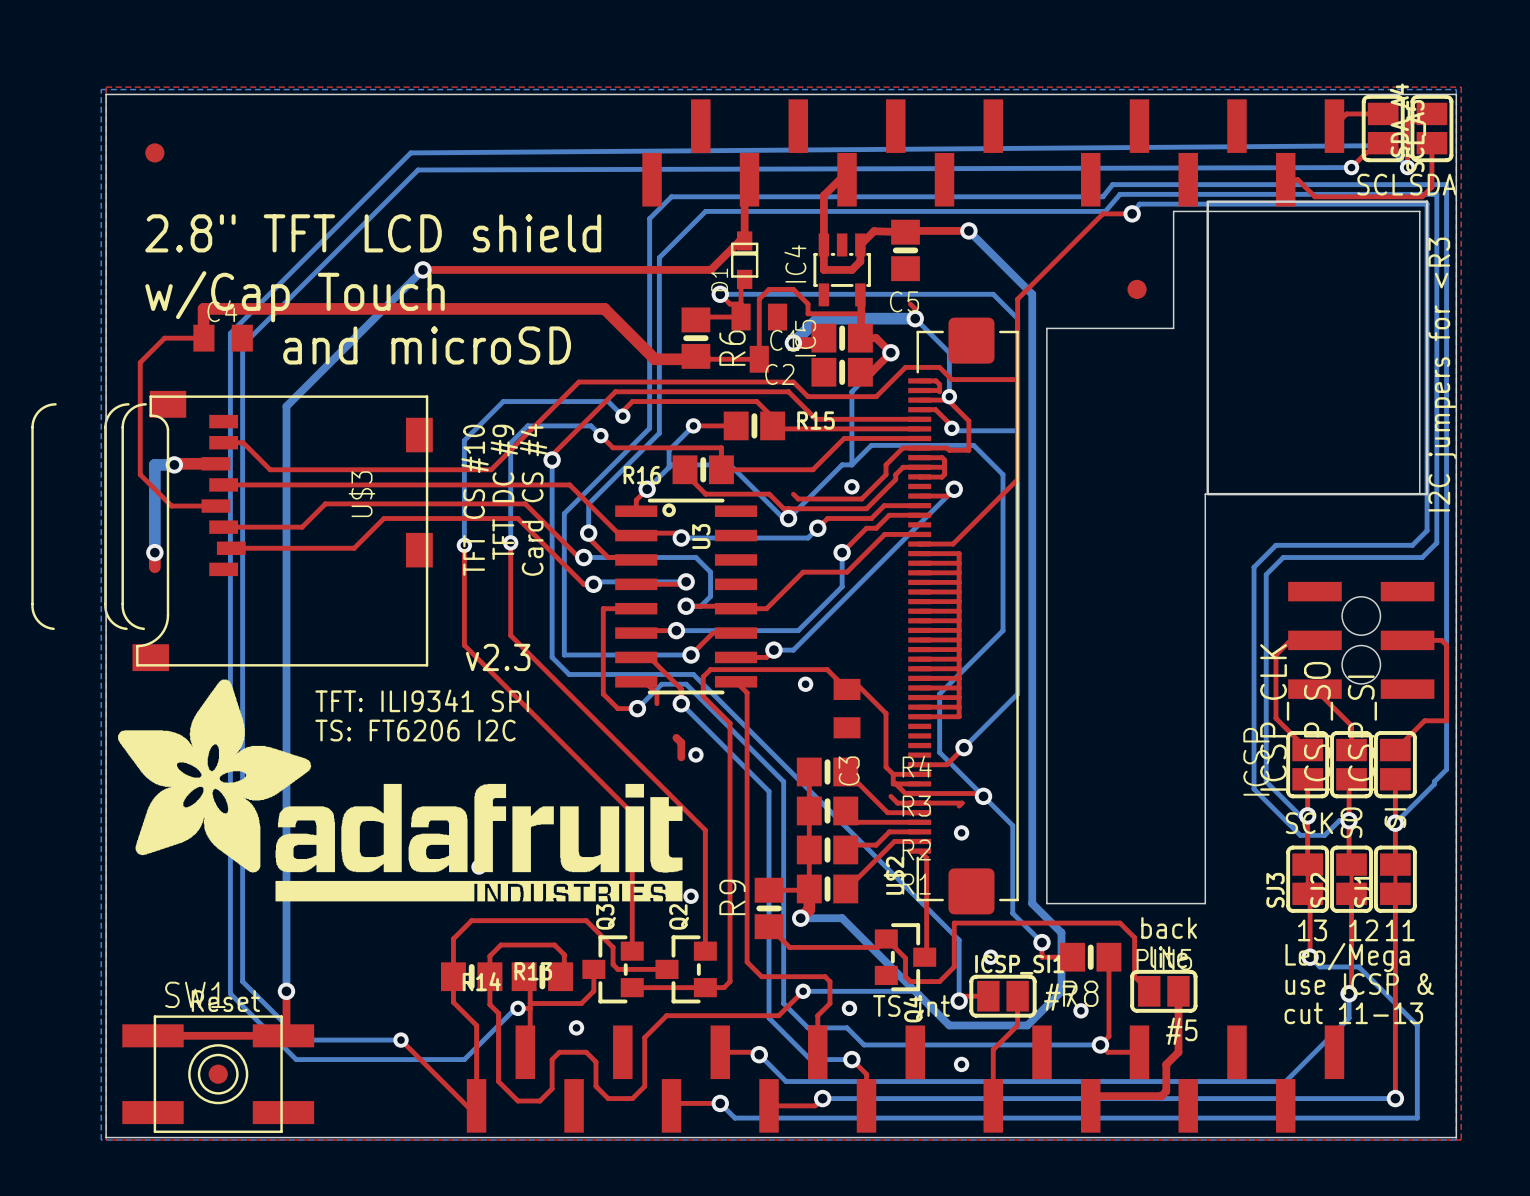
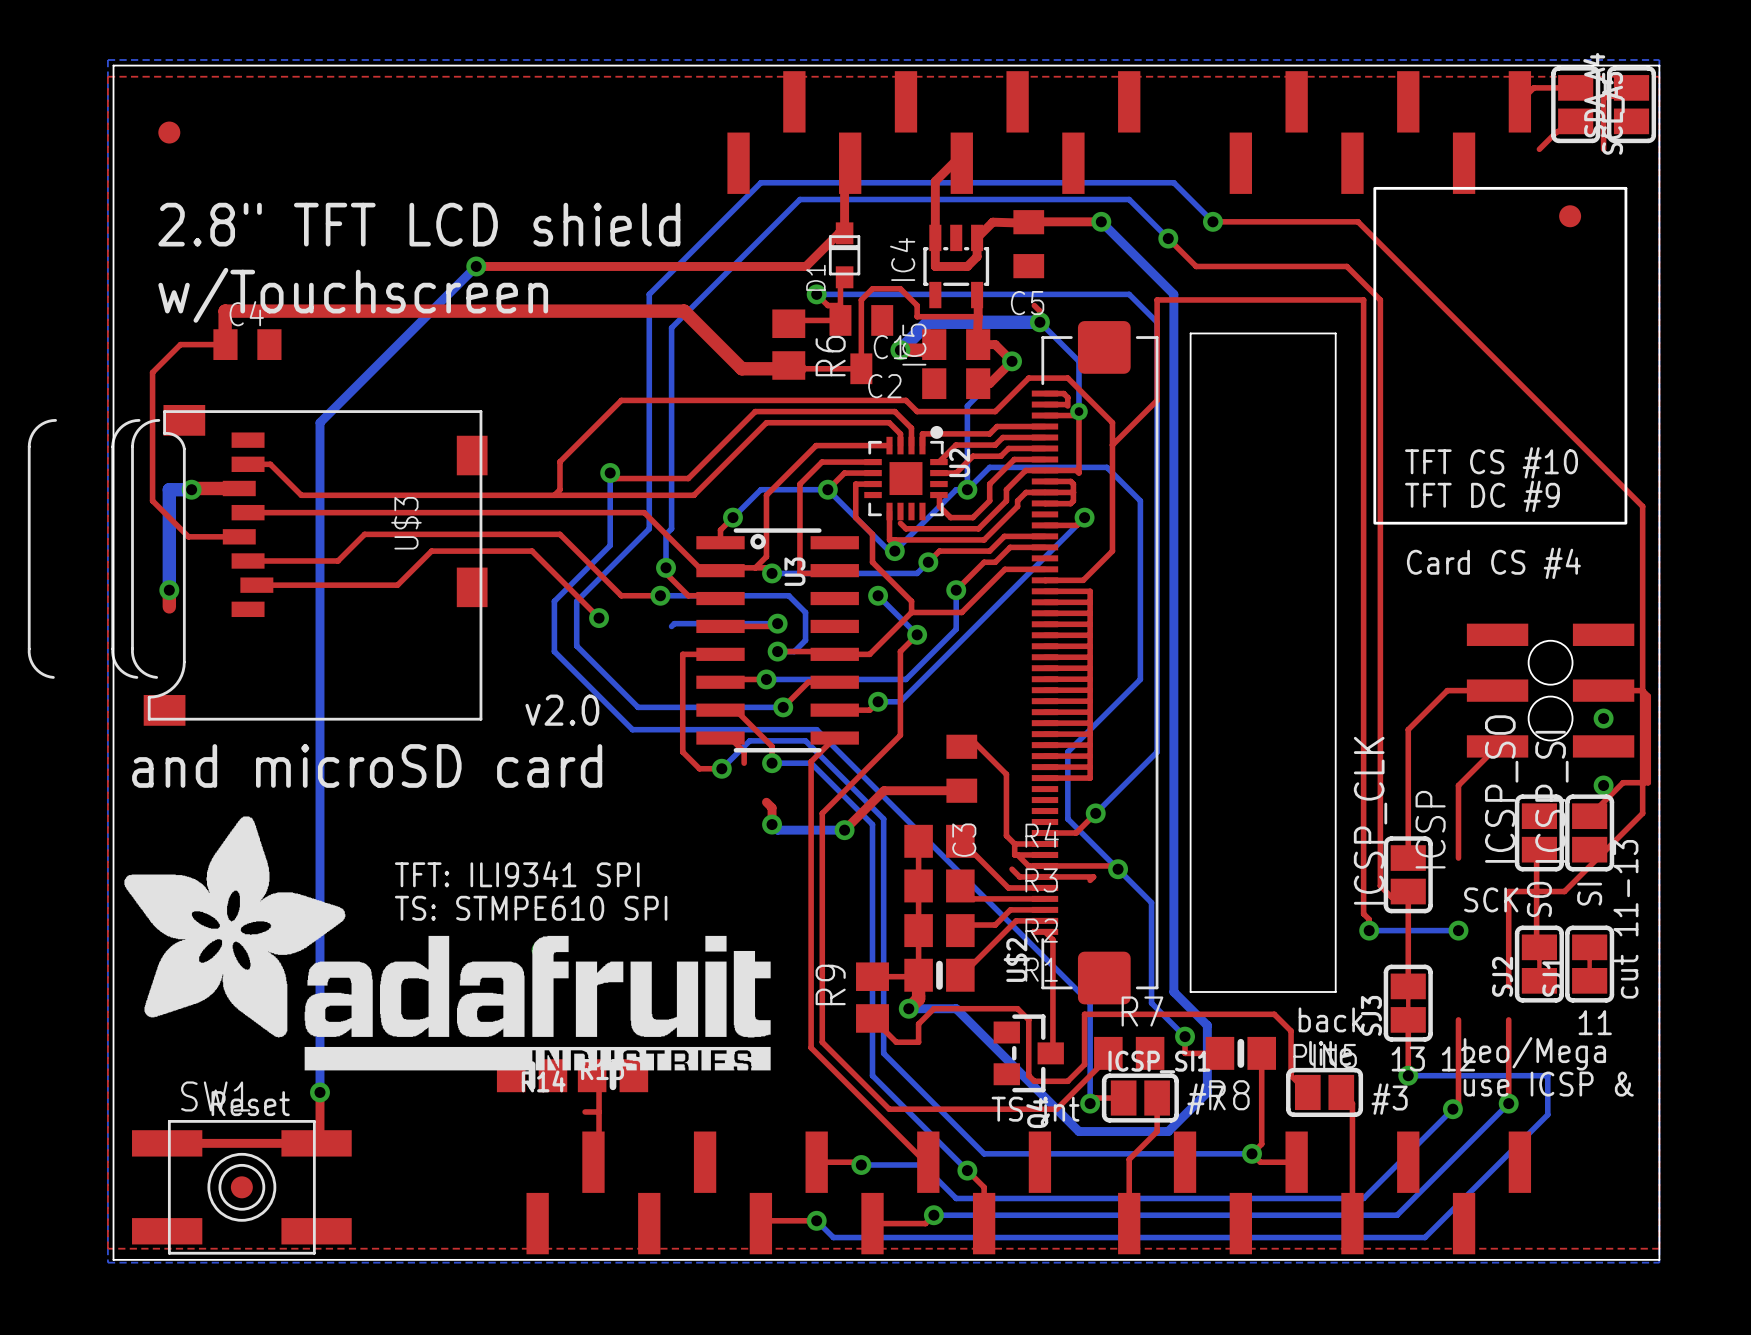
top zone outline: (106, 87) (106, 1140) (1461, 1140) (1461, 87) (106, 87) -> (107, 76) (107, 1248) (1659, 1248) (1659, 76) (107, 76)
top track: (1431, 143) (1431, 187) (1422, 196) (1314, 196) (1297, 179) (1285, 179) -> none
bottom track: (1351, 167) (418, 169) (242, 345) (242, 981) (301, 1040) (401, 1040) -> none
via: (1351, 167) -> none
bottom track: (1407, 167) (1388, 145) (410, 152) (230, 333) (230, 993) (296, 1059) (464, 1059) (518, 1005) (518, 1008) -> none
via: (1407, 167) -> none
text: SCL (1380, 184) -> none
text: SDA (1433, 184) -> none
bottom track: (1032, 196) (1102, 196) (1112, 184) (1446, 184) (1446, 769) (1395, 823) -> (1173, 182) (1212, 221)
bottom track: (993, 211) (1105, 211) (1119, 194) (1436, 194) (1436, 542) (1422, 557) (1283, 557) (1266, 574) (1266, 781) (1300, 815) (1307, 815) -> (1129, 199) (1168, 238)
top track: (1132, 213) (1102, 213) (1017, 299) -> (1369, 930) (1369, 919) (1363, 913) (1363, 299) (1157, 299)
bottom track: (1132, 213) (1139, 204) (1427, 204) (1427, 530) (1412, 545) (1275, 545) (1254, 567) (1254, 789) (1300, 835) (1324, 835) (1339, 820) (1349, 820) (1346, 818) -> none
via: (1132, 213) -> none
bottom track: (649, 218) (649, 428) (564, 513) (564, 654) -> (735, 207) (649, 294) (649, 528) (576, 601) (576, 645) (638, 707)
C5 footprint: [891, 219, 920, 282] -> [1013, 210, 1045, 279]
top track: none -> (1212, 221) (1358, 221) (1642, 506) (1642, 813) (1564, 891) (1508, 891) (1508, 986)
via: none -> (1212, 221)
top track: none -> (1168, 238) (1196, 266) (1346, 266) (1380, 299) (1380, 885) (1391, 897) (1408, 897)
via: none -> (1168, 238)
bottom track: (659, 257) (659, 433) (593, 499) -> (746, 252) (671, 327) (671, 528)
part position: (1137, 289) -> (1570, 216)
text: w/Cap Touch (295, 296) -> w/Touchscreen (353, 295)
R6 footprint: [681, 307, 711, 369] -> [772, 309, 806, 380]
C1 footprint: [811, 323, 873, 353] -> [922, 329, 991, 360]
board edge: (1173, 328) (1173, 211) (1419, 211) (1419, 494) (1205, 494) (1205, 903) (1173, 903) -> (1335, 333) (1335, 991)
text: and microSD (427, 345) -> none
C2 footprint: [811, 357, 873, 387] -> [922, 368, 991, 400]
text: I2C jumpers for <R3 (1442, 374) -> none
top track: (951, 379) (1017, 379) -> none
top track: (798, 386) (793, 382) (578, 382) (496, 464) -> (905, 400) (621, 400) (559, 461) (559, 489)
top track: (1017, 386) (1017, 479) (978, 518) -> (1081, 392) (1112, 422) (1112, 551)
top track: none -> (1157, 400) (1112, 445)
top track: (949, 401) (968, 421) (968, 450) (949, 450) -> (1078, 417) (1078, 472)
top track: (919, 409) (935, 409) (951, 425) (951, 428) -> (1044, 426) (997, 426) (989, 433) (922, 433) (922, 445)
top track: (622, 416) (622, 411) (632, 401) (756, 401) (772, 417) (772, 425) (775, 428) (887, 428) -> (938, 473) (956, 473) (972, 456) (1000, 456) (1008, 448)
bottom track: (622, 416) (608, 401) (503, 401) (464, 440) (464, 545) -> none
via: (622, 416) -> none
top track: (882, 419) (816, 419) (788, 391) (615, 391) (552, 455) (552, 460) -> (1002, 437) (995, 445) (955, 445) (938, 462)
top track: (693, 425) (736, 425) -> none
bottom track: (693, 425) (669, 450) (669, 467) -> none
via: (693, 425) -> none
R15: (754, 425) -> none
top track: none -> (889, 445) (816, 445) (766, 495) (766, 556) (755, 567)
top track: none -> (900, 445) (900, 433) (889, 422) (766, 422) (693, 495) (554, 495)
top track: none -> (911, 445) (911, 428) (894, 411) (755, 411) (688, 478) (615, 478) (610, 472)
bottom track: (951, 428) (954, 430) (1017, 430) -> none
via: (951, 428) -> none
top track: (600, 435) (613, 447) (721, 447) (721, 469) (812, 469) (844, 438) (892, 438) -> (938, 495) (939, 506) (950, 517) (972, 517) (989, 500) (989, 484) (1014, 459)
bottom track: (600, 435) (591, 425) (527, 425) (510, 442) (510, 542) -> none
via: (600, 435) -> none
top track: none -> (873, 462) (822, 462) (799, 484) (799, 573) (837, 573) (834, 570)
text: none -> TFT CS #10 (1491, 462)
top track: none -> (873, 473) (844, 473) (827, 489)
U2: none -> (905, 473)
bottom track: (552, 460) (552, 657) (569, 674) -> (610, 472) (610, 545) (554, 601) (554, 651) (632, 729) (643, 729)
via position: (552, 460) -> (610, 472)
top track: none -> (872, 484) (855, 484) (855, 517) (872, 534) (872, 562) (911, 601) (911, 612)
via: none -> (827, 489)
via: none -> (967, 489)
top track: (685, 469) (685, 473) (705, 494) (769, 494) (783, 508) -> (889, 511) (889, 539)
R16: (703, 469) -> none
text: none -> TFT DC #9 (1482, 496)
via: (851, 486) -> none
text: TFT DC #9 (504, 492) -> none
text: Card CS #4 (533, 499) -> none
text: TFT CS #10 (475, 500) -> none
top track: (496, 503) (525, 503) (578, 557) -> (559, 534) (621, 595) (654, 595)
top track: (471, 518) (518, 518) (583, 584) (593, 584) -> (532, 551) (599, 618)
text: none -> Card CS #4 (1493, 563)
top track: (510, 542) (510, 635) (705, 830) (705, 951) -> none
via: (510, 542) -> none
top track: (464, 545) (464, 645) (632, 813) (632, 951) -> none
via: (464, 545) -> none
bottom track: none -> (878, 595) (917, 634)
via: none -> (878, 595)
via: none -> (599, 618)
via: (593, 584) -> none
top track: none -> (917, 634) (900, 651) (900, 735) (822, 813) (822, 1042) (889, 1109) (1056, 1109) (1106, 1058) (1108, 1053)
via: none -> (917, 634)
top track: (1290, 640) (1275, 654) (1275, 718) (1307, 750) -> (1469, 690) (1447, 690) (1408, 729) (1408, 858)
text: v2.3 (498, 657) -> v2.0 (562, 710)
via: none -> (1603, 718)
bottom track: (693, 674) (959, 940) -> (786, 729) (816, 729) (1090, 1003) (1090, 1033)
top track: (736, 681) (747, 692) (747, 962) (761, 976) (825, 976) (829, 981) (829, 1003) (817, 1015) (817, 1052) -> (834, 738) (811, 761) (811, 1047) (928, 1165)
bottom track: (686, 684) (783, 781) (783, 1003) (808, 1027) (847, 1027) (864, 1044) (866, 1044) -> (777, 740) (805, 740) (883, 818) (883, 1053) (984, 1153)
via: (805, 684) -> none
top track: (847, 689) (827, 669) (710, 669) (703, 676) (703, 696) (730, 723) (730, 981) (724, 987) (632, 987) -> none
top track: (1314, 689) (1351, 725) (1351, 750) -> (1497, 746) (1458, 785) (1458, 858)
text position: TFT: ILI9341 SPI (422, 700) -> TFT: ILI9341 SPI (517, 874)
bottom track: (681, 703) (769, 791) -> (772, 763) (811, 763) (872, 824) (872, 863)
text: none -> and microSD card (367, 765)
via: none -> (1603, 785)
top track: none -> (961, 790) (884, 790) (844, 830)
text: TS: FT6206 I2C (415, 730) -> none
via position: (695, 754) -> (772, 824)
bottom track: none -> (772, 824) (777, 830) (844, 830)
R4 footprint: [796, 757, 859, 787] -> [904, 824, 975, 858]
via: none -> (844, 830)
ICSP_CLK position: (1307, 764) -> (1408, 874)
top track: (1307, 779) (1307, 864) -> none
top track: (1395, 779) (1395, 864) -> none
drawing position: (400, 790) -> (447, 943)
R3 footprint: [796, 796, 859, 826] -> [904, 869, 975, 903]
top track: none -> (1408, 891) (1408, 986)
via: (1307, 815) -> none
via: (1349, 820) -> none
via: (1395, 823) -> none
text: none -> TS: STMPE610 SPI (531, 908)
via: (961, 832) -> none
R2 footprint: [796, 835, 859, 865] -> [904, 914, 975, 948]
bottom track: none -> (1369, 930) (1458, 930)
via: none -> (1369, 930)
via: none -> (1458, 930)
R9 footprint: [754, 877, 784, 940] -> [856, 962, 889, 1033]
SJ3 position: (1307, 879) -> (1408, 1003)
top track: (1307, 893) (1310, 896) (1310, 957) -> none
top track: (1351, 893) (1351, 991) (1349, 993) -> none
top track: (1395, 893) (1395, 1098) -> none
via: (691, 896) -> none
top track: none -> (1408, 1019) (1408, 1075)
top track: none -> (1458, 1019) (1458, 1103) (1452, 1109)
top track: none -> (1508, 1019) (1508, 1103)
text position: 13 (1312, 930) -> 13 (1408, 1058)
text position: 12 (1363, 930) -> 12 (1458, 1058)
top track: (809, 947) (877, 947) (886, 938) (905, 958) -> (918, 1042) (918, 1024) (933, 1008) (1017, 1008) (1028, 1019) (1028, 1054)
via: (990, 957) -> none
R7: none -> (1129, 1053)
bottom track: (1310, 957) (1319, 966) (1358, 966) (1417, 1025) (1417, 1118) (1251, 1118) -> (1408, 1075) (1547, 1075) (1547, 1114) (1425, 1237)
via: (1310, 957) -> none
top track: (593, 969) (593, 991) (581, 1003) (530, 1003) -> none
Q3: (613, 969) -> none
top track: (666, 969) (617, 969) (613, 964) (613, 947) (586, 920) (471, 920) (453, 938) (453, 1002) (476, 1025) (476, 1110) (481, 1115) (476, 1115) (401, 1040) -> none
Q2: (686, 969) -> none
top track: (560, 976) (564, 975) (564, 954) (554, 945) (500, 945) (489, 956) (489, 1004) (498, 1013) (498, 1081) (518, 1101) (539, 1101) (552, 1088) (552, 1059) (559, 1052) (586, 1052) (595, 1062) (595, 1086) (608, 1098) (632, 1098) (644, 1086) (644, 1037) (666, 1015) (778, 1015) (803, 991) -> none
bottom track: (769, 976) (769, 1018) (810, 1059) (851, 1059) -> (872, 1075) (967, 1170)
via: none -> (1408, 1075)
bottom track: (803, 991) (915, 991) -> none
via: (803, 991) -> none
top track: (1178, 991) (1178, 1052) (1166, 1064) (1166, 1091) (1161, 1096) (1090, 1096) (1090, 1105) -> (1341, 1092) (1352, 1103) (1352, 1223)
bottom track: (1349, 993) (1349, 1018) (1285, 1081) (786, 1081) (759, 1054) -> (1452, 1109) (1363, 1198) (956, 1198) (922, 1165) (861, 1165)
via: (1349, 993) -> none
text: none -> #3 (1389, 1099)
via: none -> (1508, 1103)
via: none -> (1452, 1109)
via: (518, 1008) -> none
via: (849, 1008) -> none
via: (1081, 1010) -> none
text rotation: 0° (1353, 1013) -> 90° counterclockwise (1625, 919)
text position: cut 11-13 (1353, 1013) -> cut 11-13 (1625, 919)
via: (576, 1027) -> none
text: #5 (1181, 1031) -> none
via: (401, 1040) -> none
via: (961, 1064) -> none
bottom track: (1227, 1098) (1395, 1098) -> (1397, 1215) (1508, 1103)
via: (1395, 1098) -> none

